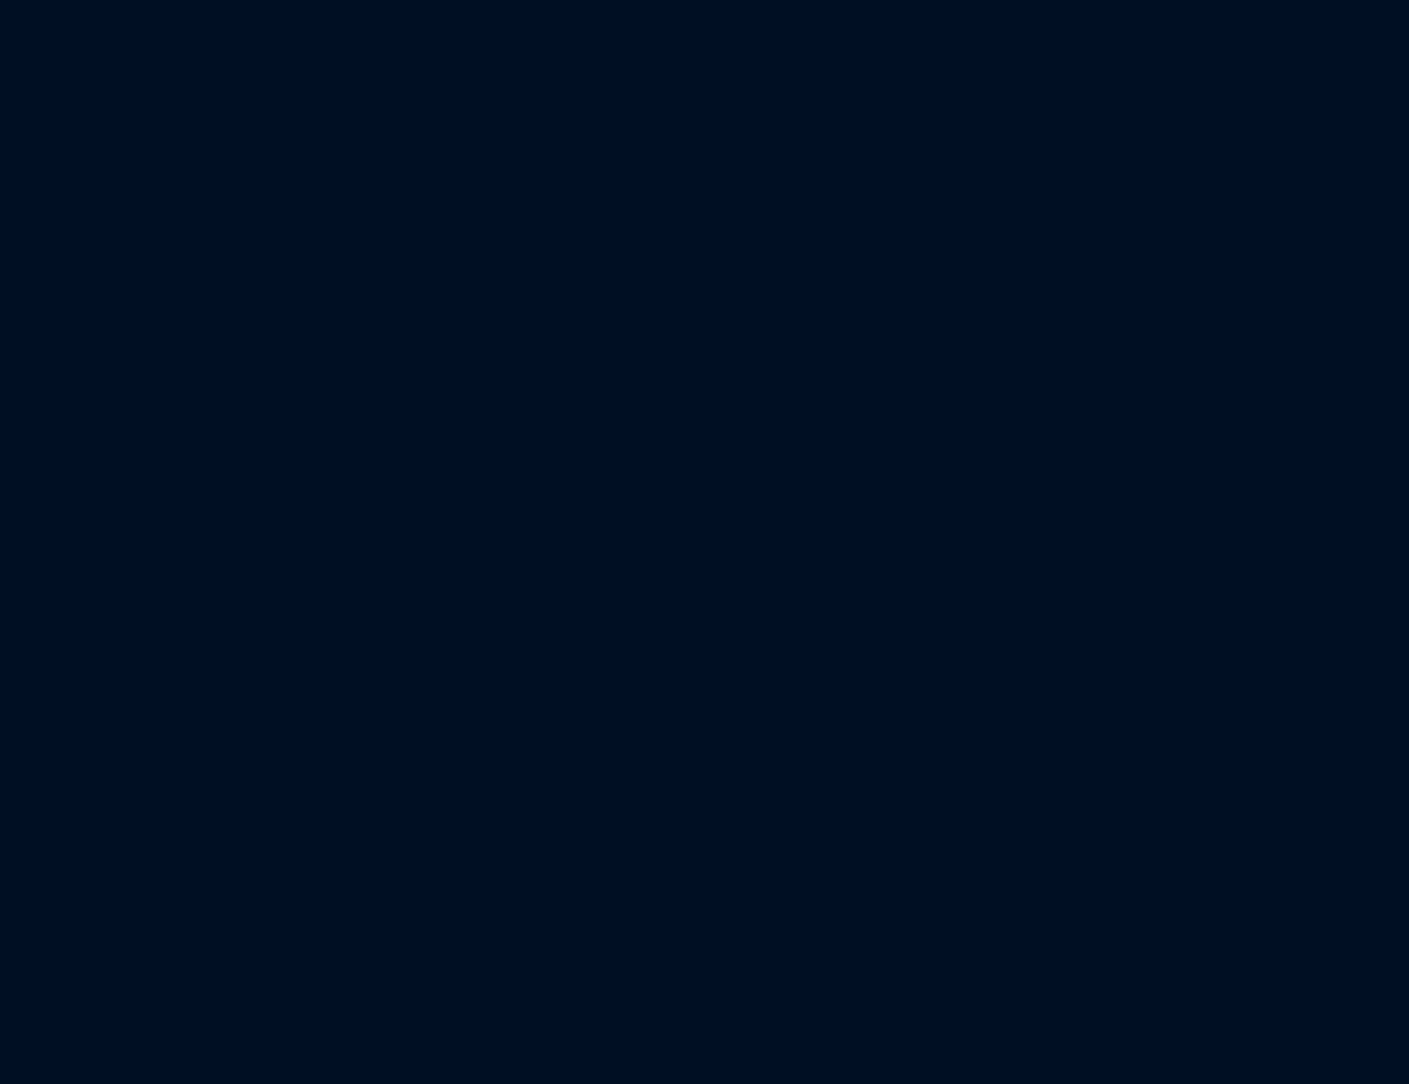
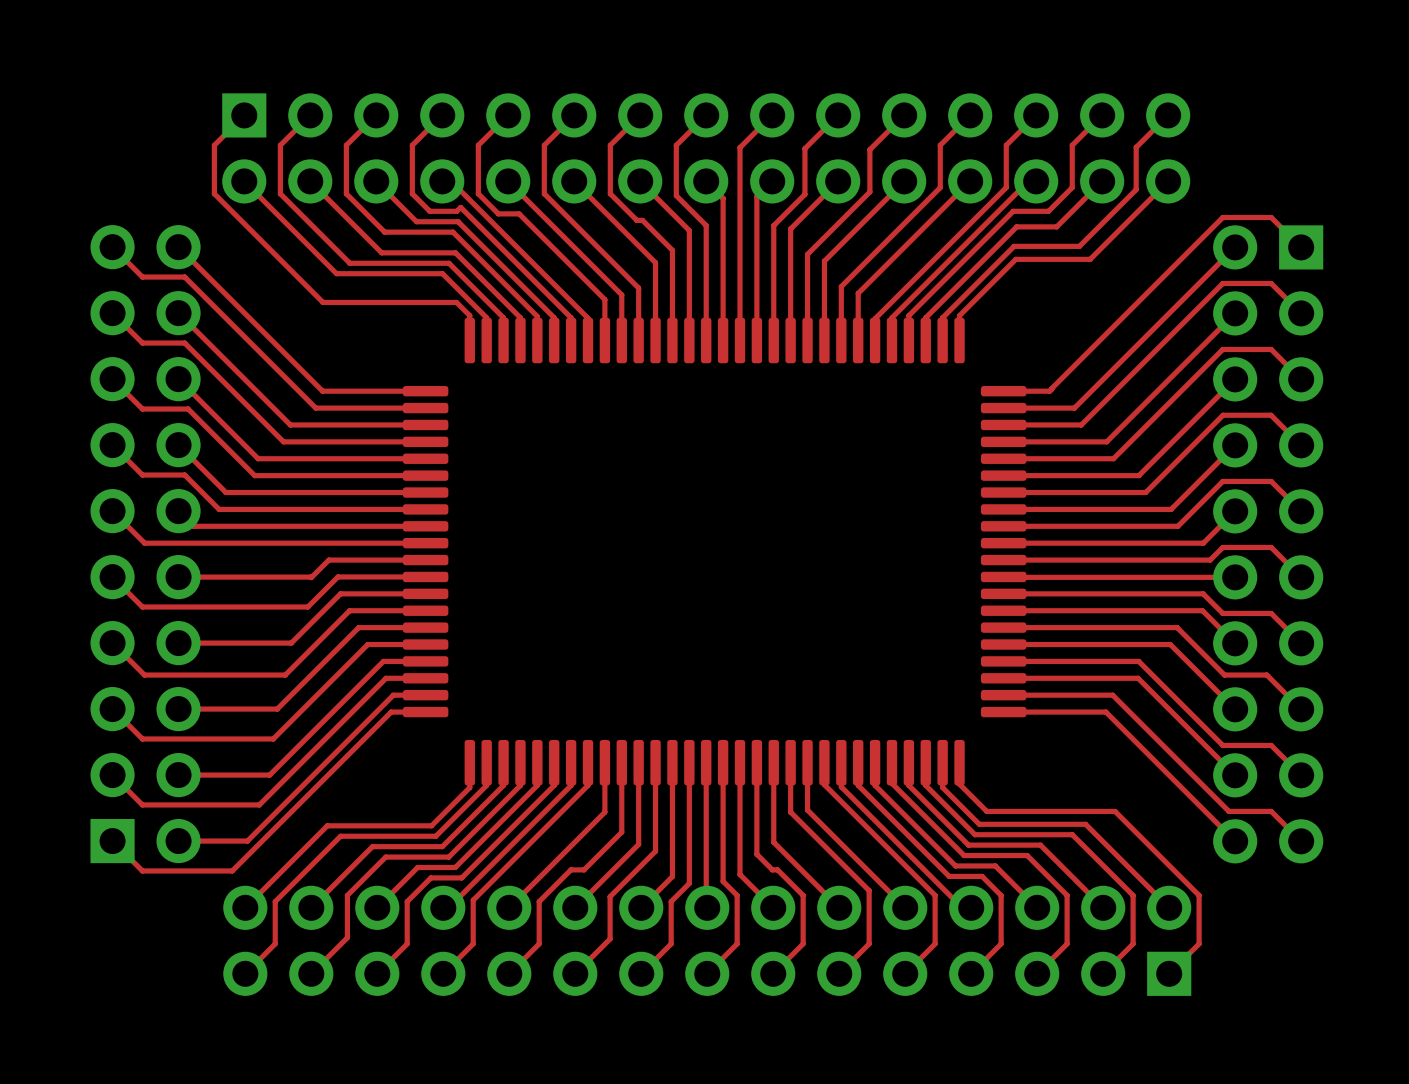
top track: none -> (244, 115) (214, 145) (214, 193) (323, 302) (456, 302) (469, 315) (469, 340)
top track: none -> (310, 115) (280, 145) (280, 193) (349, 263) (449, 263) (503, 317) (503, 340)
top track: none -> (376, 115) (346, 145) (346, 193) (384, 232) (452, 232) (537, 316) (537, 340)
top track: none -> (442, 115) (412, 145) (412, 193) (429, 211) (456, 211) (460, 207) (571, 317) (571, 340)
top track: none -> (508, 115) (478, 145) (478, 193) (498, 213) (519, 213) (604, 299) (604, 340)
top track: none -> (574, 115) (544, 145) (544, 193) (638, 288) (638, 340)
top track: none -> (640, 115) (610, 145) (610, 193) (636, 220) (642, 220) (672, 250) (672, 340)
top track: none -> (706, 115) (676, 145) (676, 195) (706, 225) (706, 340)
top track: none -> (772, 115) (739, 147) (739, 340)
top track: none -> (838, 115) (804, 148) (804, 194) (773, 225) (773, 340)
top track: none -> (904, 115) (869, 149) (869, 192) (807, 254) (807, 340)
top track: none -> (970, 115) (940, 145) (940, 187) (841, 286) (841, 340)
top track: none -> (1036, 115) (1006, 145) (1006, 187) (875, 318) (875, 340)
top track: none -> (1102, 115) (1072, 145) (1072, 187) (1048, 211) (1013, 211) (908, 315) (908, 340)
top track: none -> (1168, 115) (1136, 147) (1136, 189) (1079, 246) (1014, 246) (942, 317) (942, 340)
part: none -> (706, 148)
top track: none -> (244, 181) (336, 273) (442, 273) (486, 317) (486, 340)
top track: none -> (310, 181) (381, 252) (455, 252) (520, 317) (520, 340)
top track: none -> (376, 181) (416, 221) (458, 221) (554, 317) (554, 340)
top track: none -> (442, 181) (451, 181) (588, 318) (588, 340)
top track: none -> (508, 181) (621, 294) (621, 340)
top track: none -> (574, 181) (655, 262) (655, 340)
top track: none -> (640, 181) (689, 230) (689, 340)
top track: none -> (706, 181) (723, 198) (723, 340)
top track: none -> (772, 181) (756, 196) (756, 340)
top track: none -> (838, 181) (790, 228) (790, 340)
top track: none -> (904, 181) (824, 261) (824, 340)
top track: none -> (970, 181) (858, 293) (858, 340)
top track: none -> (1036, 181) (1028, 181) (891, 317) (891, 340)
top track: none -> (1102, 181) (1056, 226) (1016, 226) (925, 317) (925, 340)
top track: none -> (1168, 181) (1090, 259) (1015, 259) (959, 315) (959, 340)
top track: none -> (112, 247) (142, 277) (184, 277) (315, 408) (425, 408)
top track: none -> (178, 247) (322, 391) (425, 391)
top track: none -> (1235, 247) (1074, 408) (1003, 408)
top track: none -> (1301, 247) (1271, 217) (1222, 217) (1049, 391) (1003, 391)
top track: none -> (112, 313) (142, 343) (184, 343) (283, 441) (425, 441)
top track: none -> (178, 313) (290, 424) (425, 424)
top track: none -> (1235, 313) (1106, 441) (1003, 441)
top track: none -> (1301, 313) (1271, 283) (1222, 283) (1081, 424) (1003, 424)
top track: none -> (112, 379) (142, 409) (188, 409) (254, 475) (425, 475)
top track: none -> (178, 379) (258, 458) (425, 458)
top track: none -> (1235, 379) (1138, 475) (1003, 475)
top track: none -> (1301, 379) (1271, 349) (1222, 349) (1113, 458) (1003, 458)
top track: none -> (112, 445) (142, 475) (184, 475) (219, 509) (425, 509)
top track: none -> (178, 445) (225, 492) (425, 492)
top track: none -> (1235, 445) (1171, 509) (1003, 509)
top track: none -> (1301, 445) (1271, 415) (1223, 415) (1145, 492) (1003, 492)
top track: none -> (112, 511) (144, 543) (425, 543)
top track: none -> (178, 511) (193, 526) (425, 526)
top track: none -> (1235, 511) (1203, 543) (1003, 543)
top track: none -> (1301, 511) (1271, 481) (1222, 481) (1177, 526) (1003, 526)
part: none -> (145, 544)
part: none -> (1268, 544)
part: none -> (714, 551)
top track: none -> (425, 560) (328, 560) (311, 577) (178, 577)
top track: none -> (1003, 560) (1210, 560) (1222, 547) (1271, 547) (1301, 577)
top track: none -> (425, 576) (337, 576) (307, 607) (142, 607) (112, 577)
top track: none -> (1003, 576) (1235, 577)
top track: none -> (425, 593) (340, 593) (291, 643) (178, 643)
top track: none -> (1003, 593) (1203, 593) (1222, 613) (1271, 613) (1301, 643)
top track: none -> (425, 610) (349, 610) (285, 675) (144, 675) (112, 643)
top track: none -> (1003, 610) (1202, 610) (1235, 643)
top track: none -> (425, 627) (358, 627) (277, 709) (178, 709)
top track: none -> (1003, 627) (1177, 627) (1224, 675) (1266, 675) (1301, 709)
top track: none -> (425, 644) (367, 644) (273, 738) (142, 738) (112, 709)
top track: none -> (1003, 644) (1170, 644) (1235, 709)
top track: none -> (425, 661) (383, 661) (269, 775) (178, 775)
top track: none -> (1003, 661) (1138, 661) (1222, 745) (1271, 745) (1301, 775)
top track: none -> (425, 678) (386, 678) (259, 804) (142, 804) (112, 775)
top track: none -> (1003, 678) (1138, 678) (1235, 775)
top track: none -> (425, 695) (393, 695) (247, 841) (178, 841)
top track: none -> (1003, 695) (1112, 695) (1228, 811) (1271, 811) (1301, 841)
top track: none -> (425, 712) (391, 712) (232, 870) (142, 870) (112, 841)
top track: none -> (1003, 712) (1105, 712) (1235, 841)
top track: none -> (469, 762) (469, 787) (431, 825) (327, 825) (245, 907)
top track: none -> (486, 762) (486, 785) (435, 836) (340, 836) (275, 901) (275, 943) (245, 973)
top track: none -> (503, 762) (503, 785) (442, 846) (372, 846) (311, 907)
top track: none -> (520, 762) (520, 785) (448, 857) (385, 857) (347, 895) (347, 937) (311, 973)
top track: none -> (537, 762) (537, 785) (455, 867) (417, 867) (377, 907)
top track: none -> (554, 762) (554, 785) (461, 877) (430, 877) (407, 901) (407, 943) (377, 973)
top track: none -> (571, 762) (571, 785) (448, 907) (443, 907)
top track: none -> (588, 762) (588, 785) (473, 900) (473, 943) (443, 973)
top track: none -> (604, 762) (604, 812) (509, 907)
top track: none -> (621, 762) (621, 832) (584, 869) (570, 869) (539, 901) (539, 943) (509, 973)
top track: none -> (638, 762) (638, 844) (575, 907)
top track: none -> (655, 762) (655, 851) (610, 896) (610, 939) (575, 973)
top track: none -> (672, 762) (672, 876) (641, 907)
top track: none -> (689, 762) (689, 883) (671, 901) (671, 943) (641, 973)
top track: none -> (706, 762) (707, 907)
top track: none -> (723, 762) (723, 881) (737, 895) (737, 943) (707, 973)
top track: none -> (739, 762) (739, 874) (773, 907)
top track: none -> (756, 762) (756, 854) (772, 869) (777, 869) (803, 895) (803, 943) (773, 973)
top track: none -> (773, 762) (773, 842) (839, 907)
top track: none -> (790, 762) (790, 812) (869, 890) (869, 943) (839, 973)
top track: none -> (807, 762) (807, 810) (905, 907)
top track: none -> (824, 762) (824, 784) (935, 895) (935, 943) (905, 973)
top track: none -> (841, 762) (841, 786) (962, 907) (971, 907)
top track: none -> (858, 762) (858, 785) (949, 876) (982, 876) (1001, 895) (1001, 943) (971, 973)
top track: none -> (875, 762) (875, 785) (955, 865) (995, 865) (1037, 907)
top track: none -> (891, 762) (891, 783) (964, 855) (1027, 855) (1067, 895) (1067, 943) (1037, 973)
top track: none -> (908, 762) (908, 785) (968, 845) (1040, 845) (1103, 907)
top track: none -> (925, 762) (925, 785) (975, 834) (1072, 834) (1133, 895) (1133, 943) (1103, 973)
top track: none -> (942, 762) (942, 787) (979, 824) (1085, 824) (1169, 907)
top track: none -> (959, 762) (959, 784) (986, 811) (1115, 811) (1199, 895) (1199, 943) (1169, 973)
part: none -> (707, 940)

